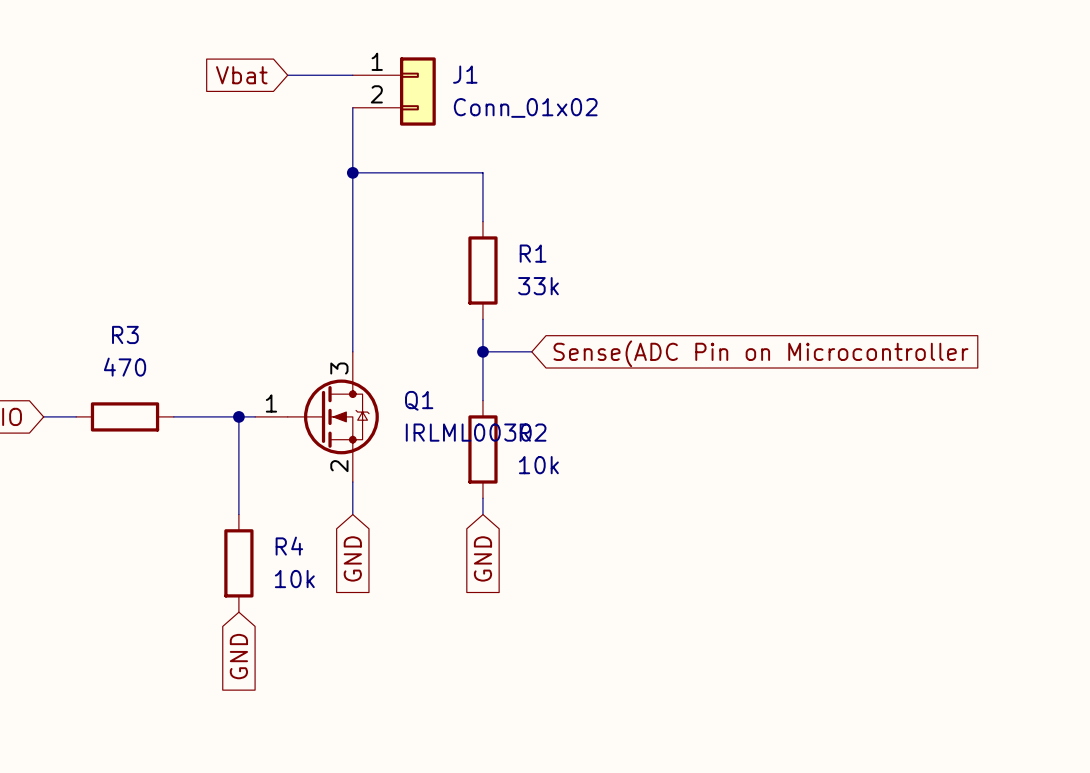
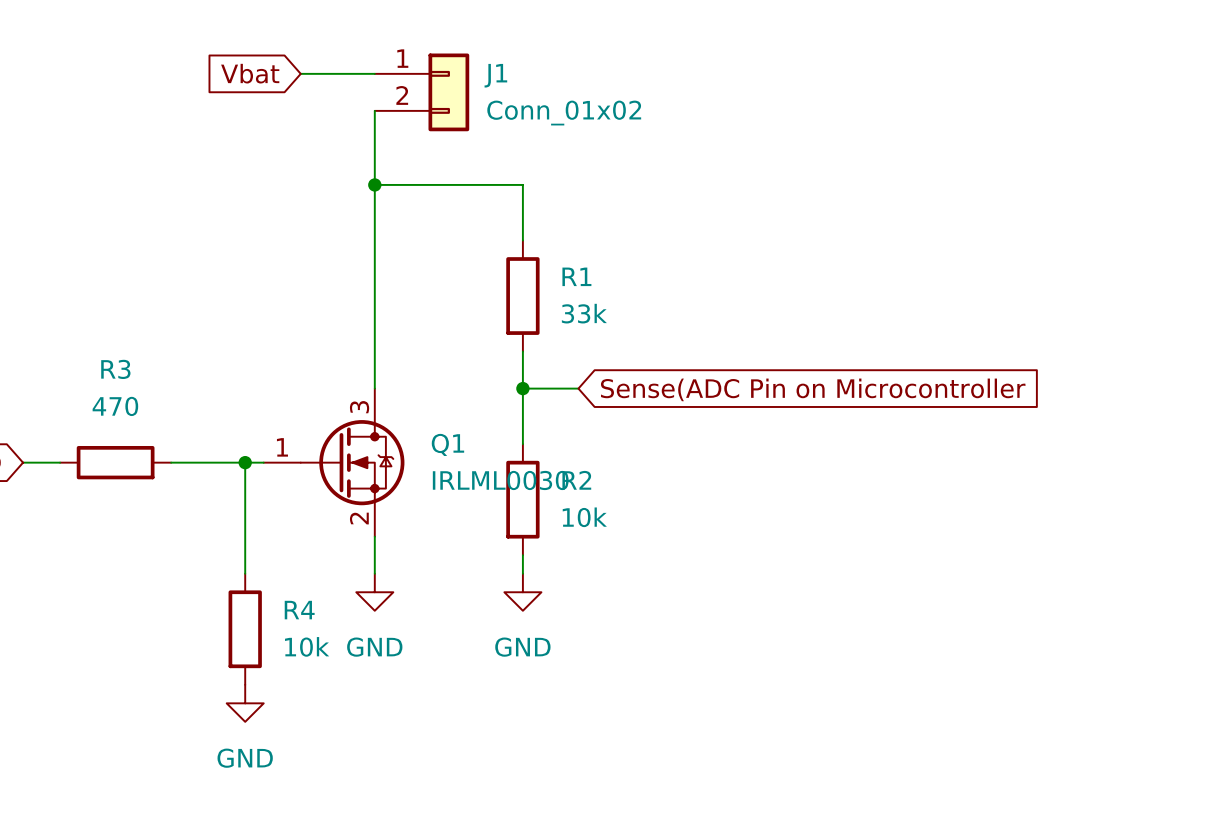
power symbol: none -> GND (374, 592)
power symbol: none -> GND (522, 592)
global label: GND (352, 558) -> none
global label: GND (482, 558) -> none
power symbol: none -> GND (245, 703)
global label: GND (238, 656) -> none

